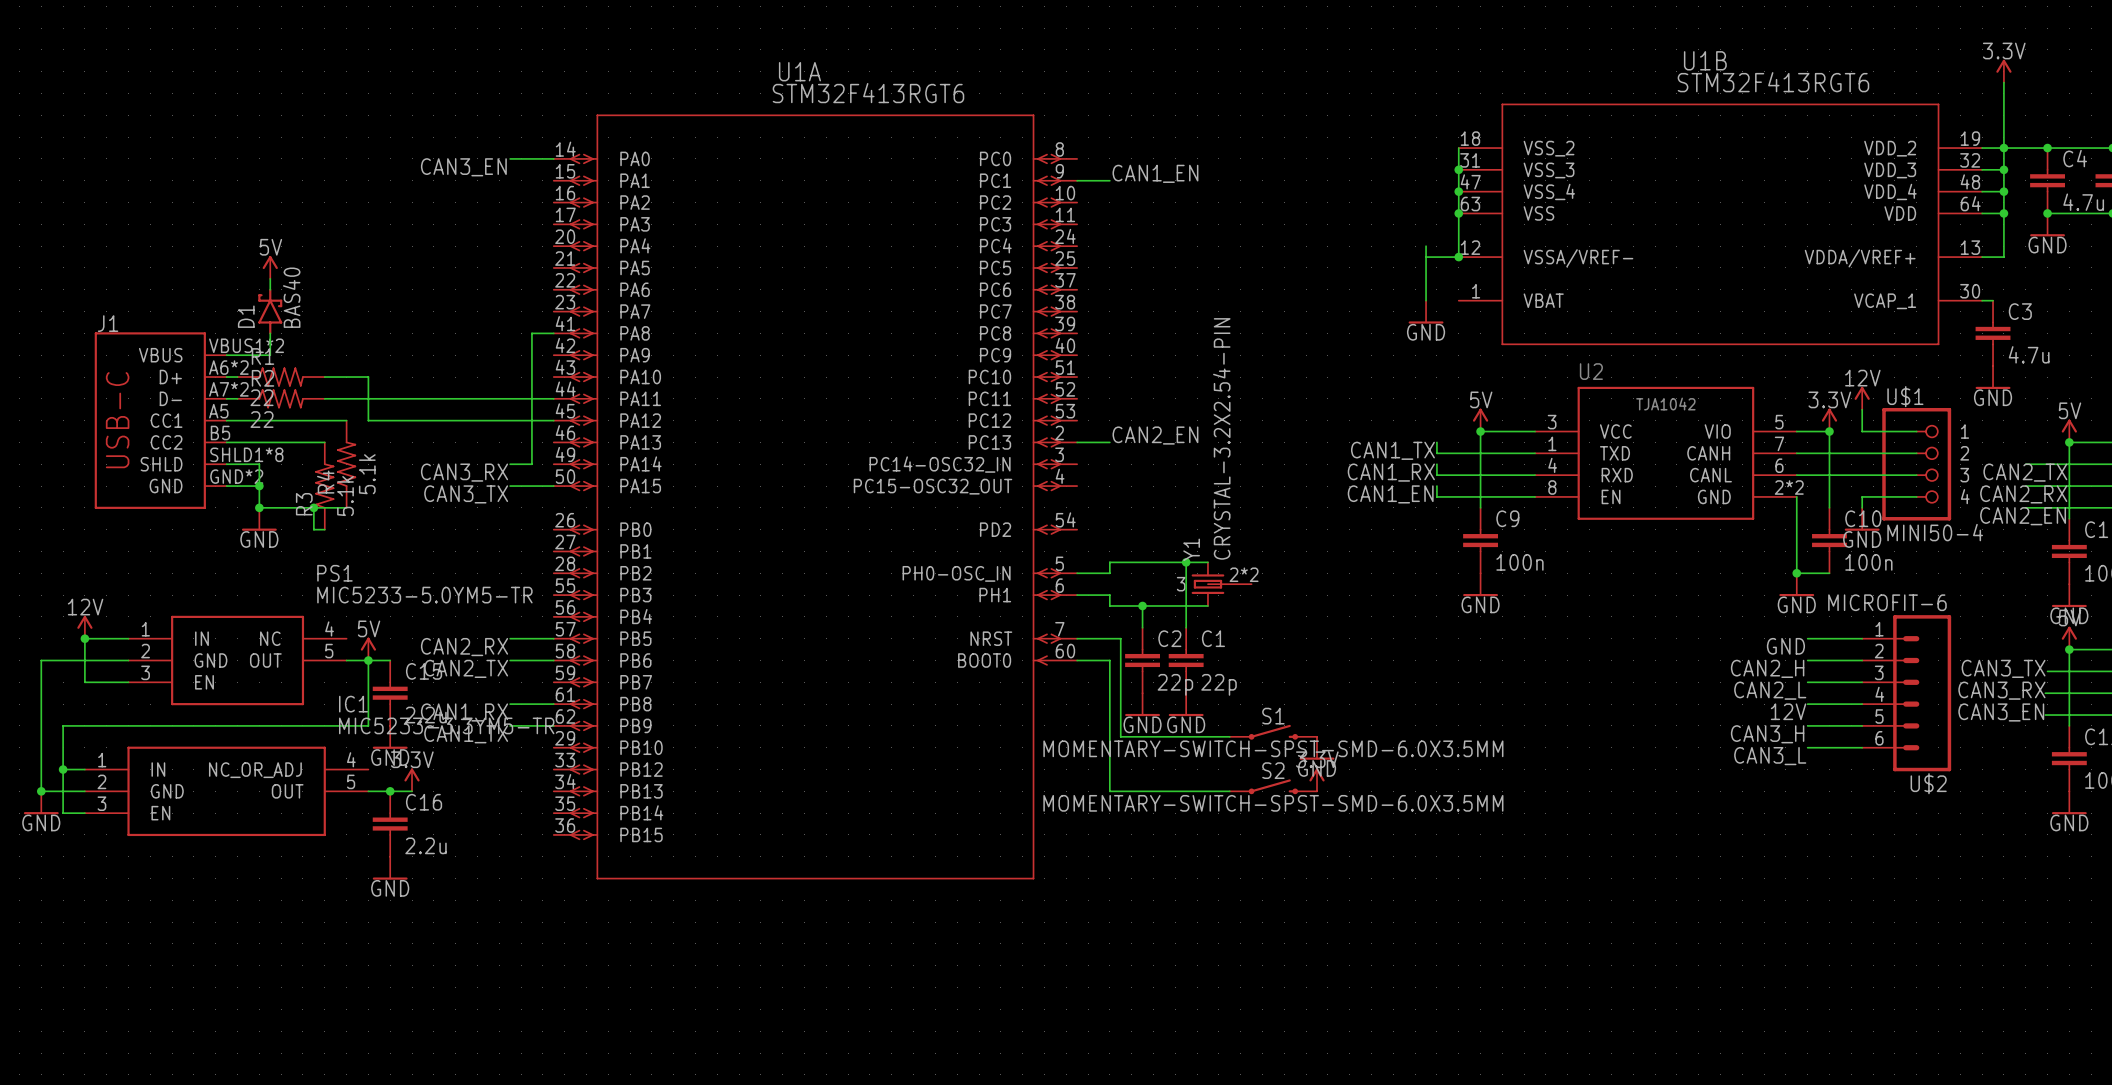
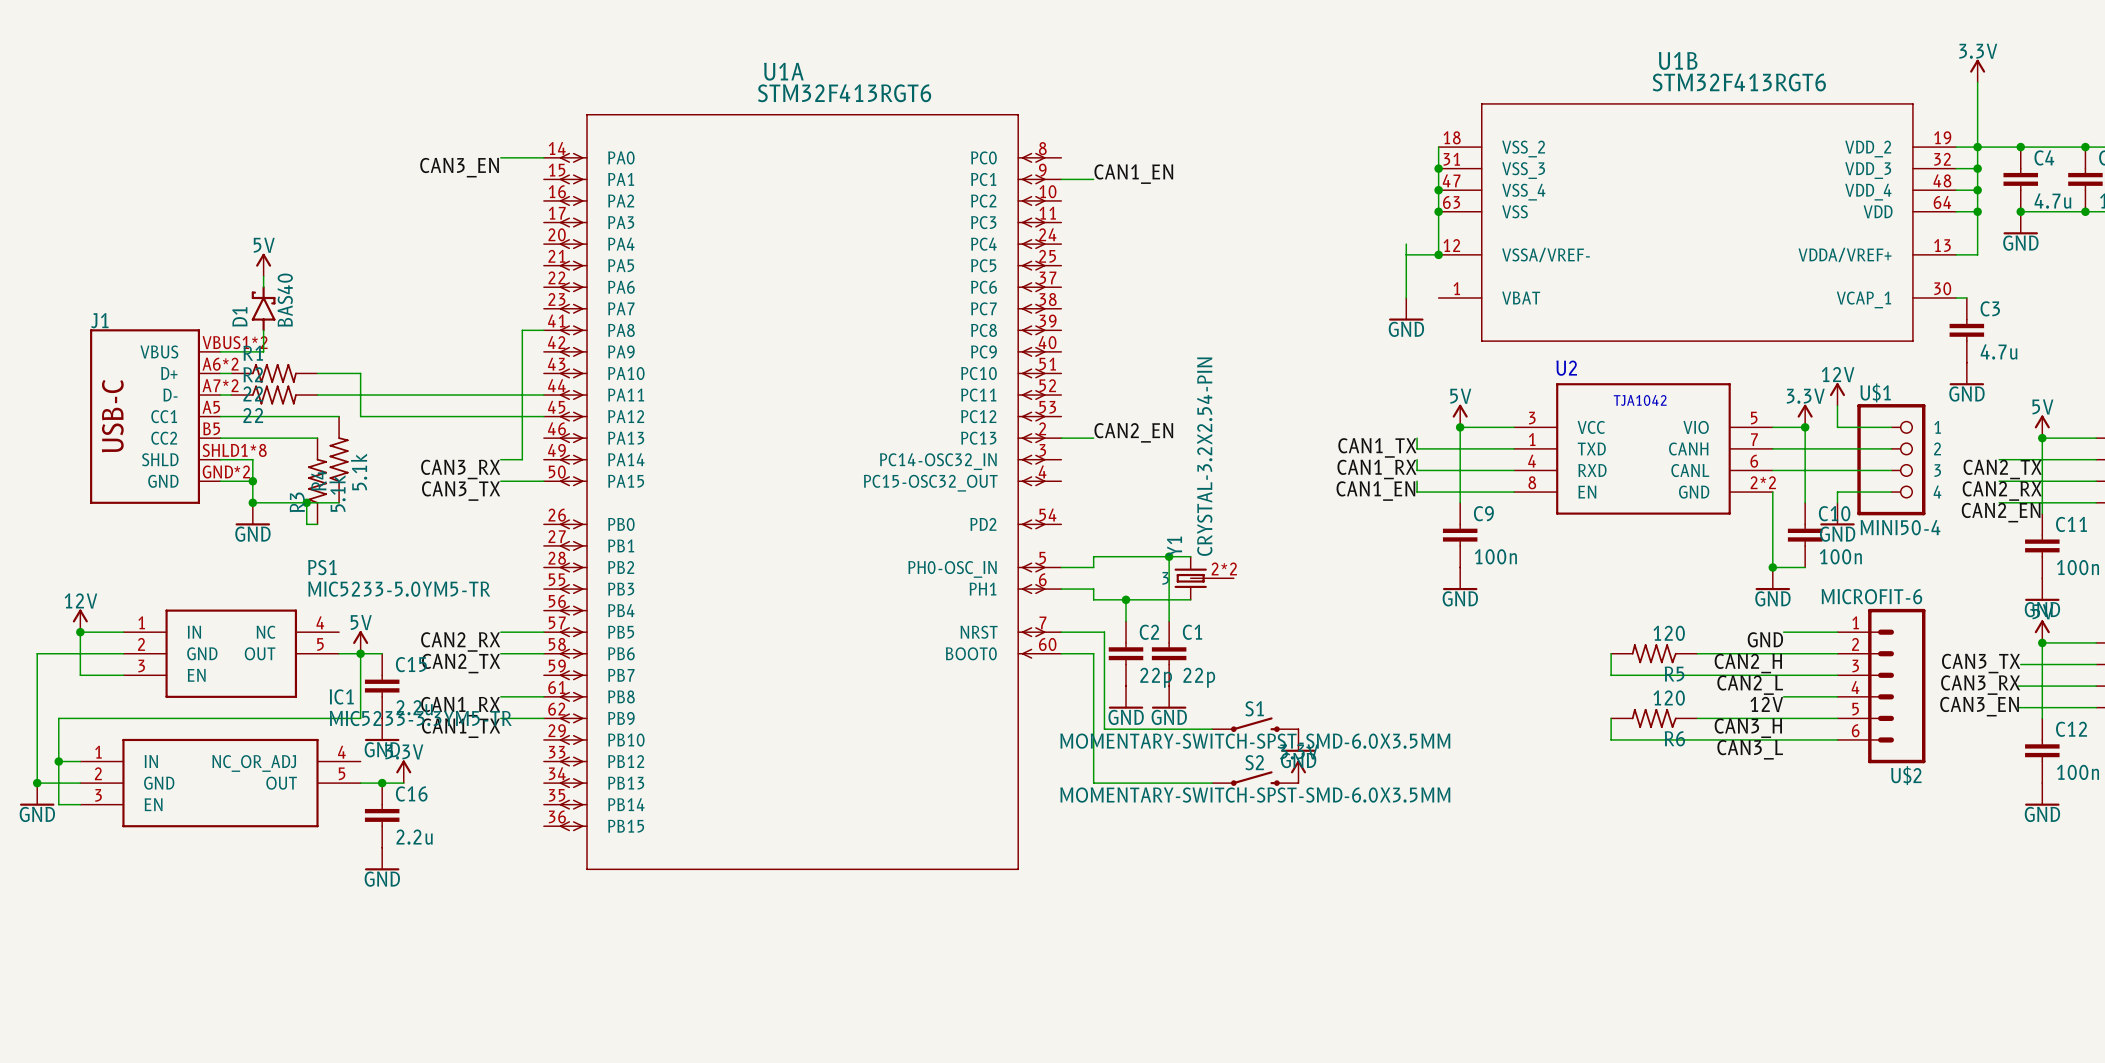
wire: none -> (1611, 653) (1611, 675) (1783, 675)
R5: none -> 120 (1654, 653)
wire: none -> (1697, 653) (1783, 653)
wire: none -> (1611, 718) (1611, 739) (1783, 739)
R6: none -> 120 (1654, 718)
wire: none -> (1697, 718) (1783, 718)

